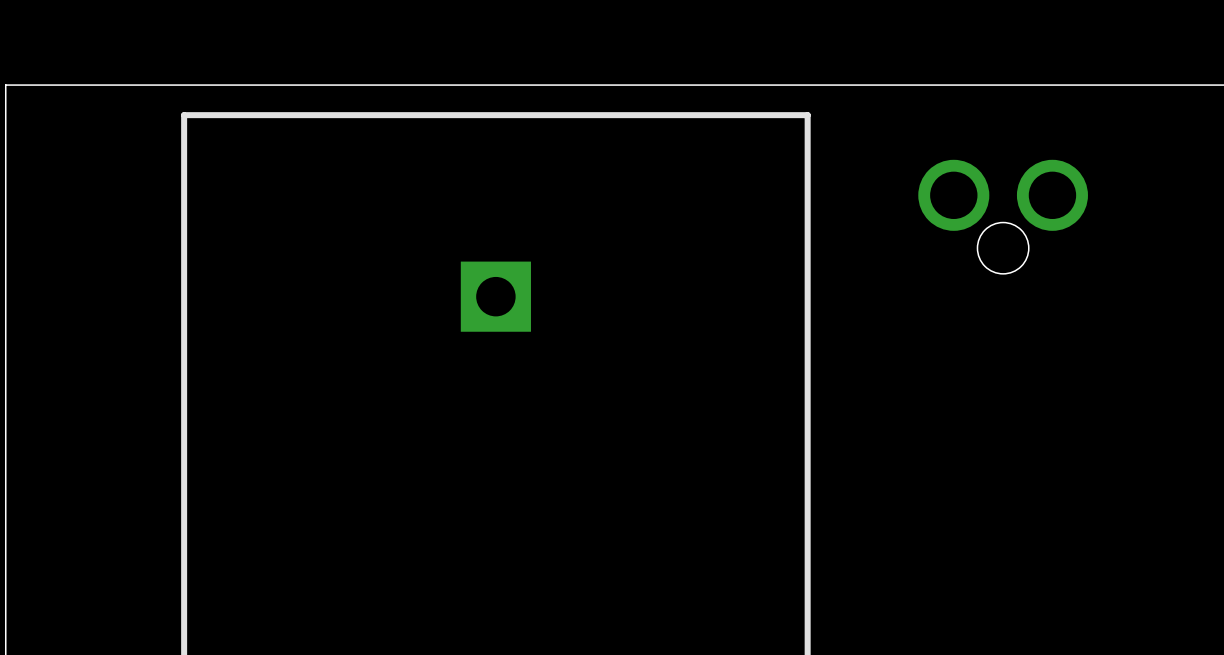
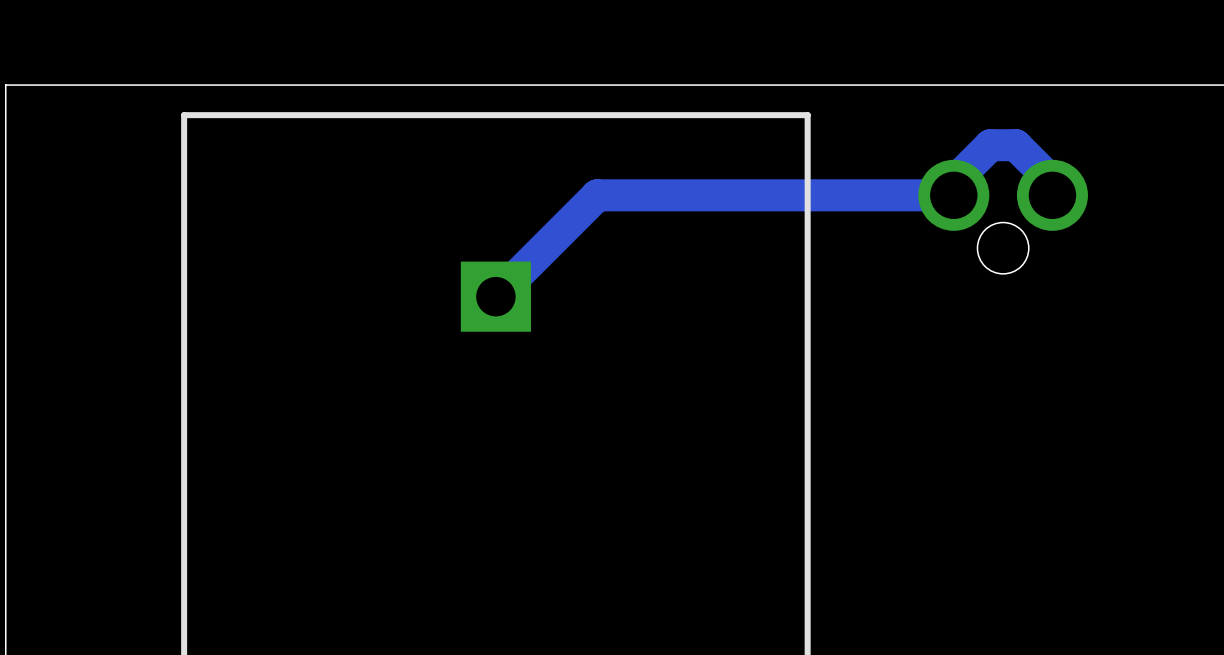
track: none -> (1059, 188) (1015, 145) (990, 145) (940, 195) (597, 195) (495, 296)

